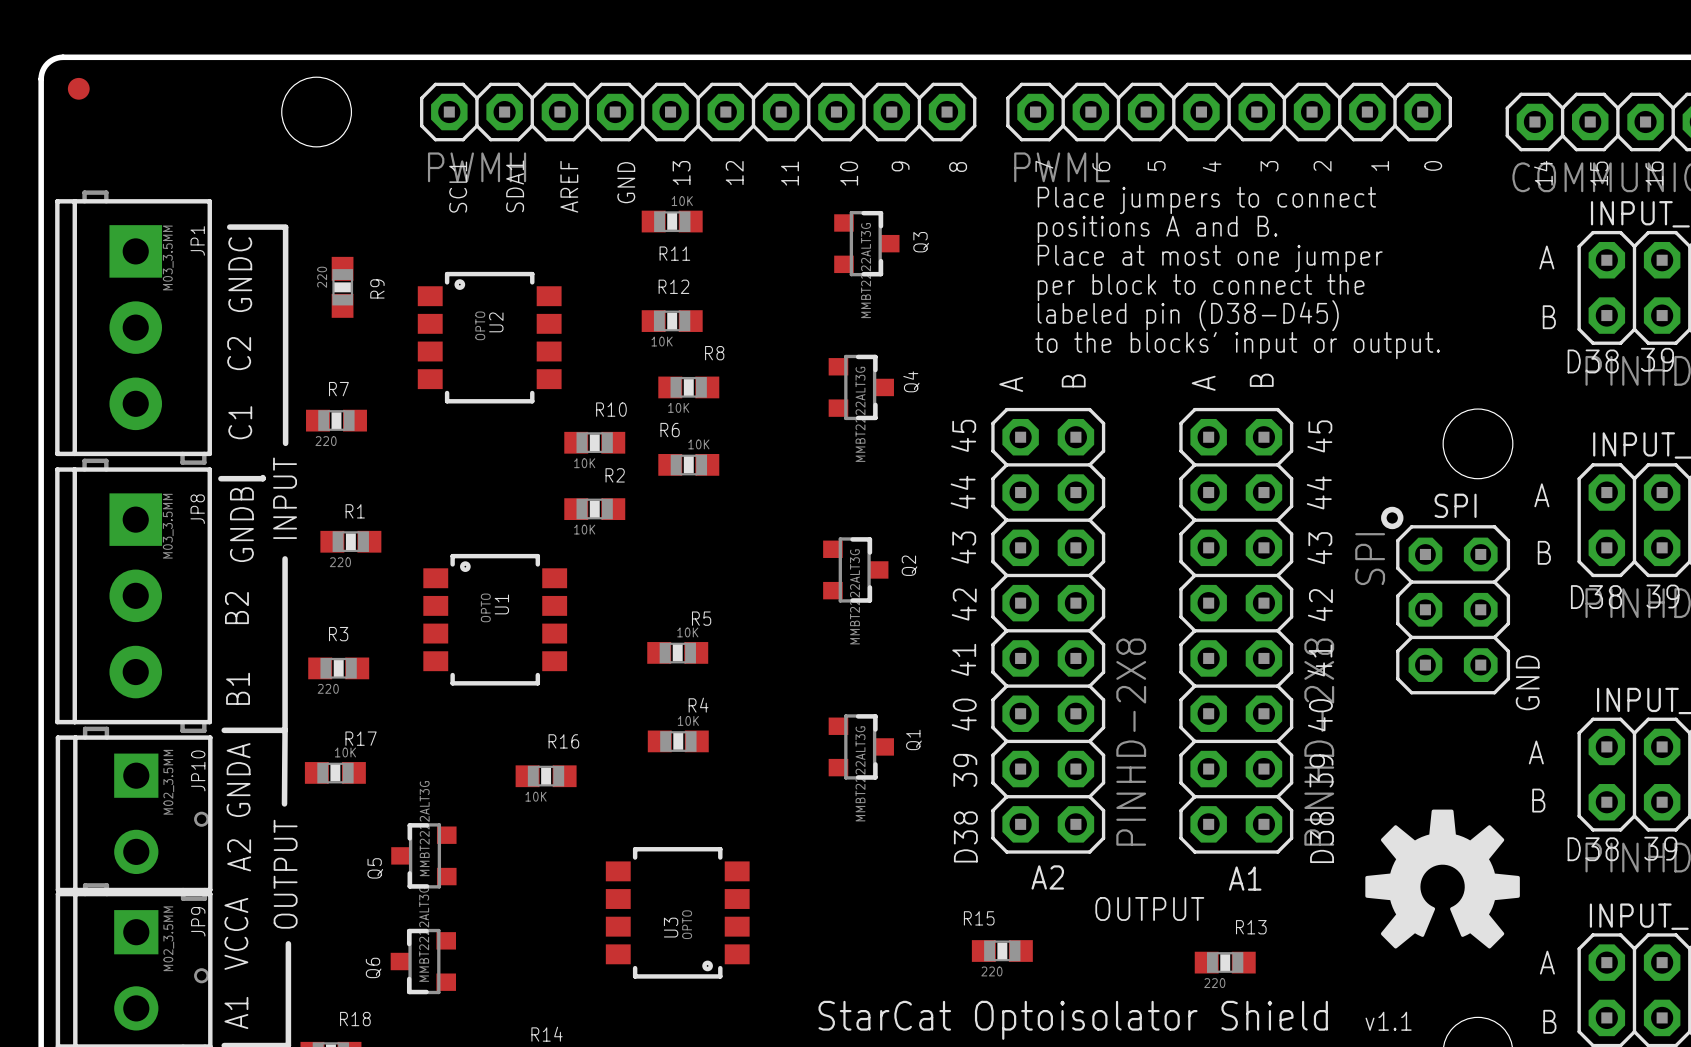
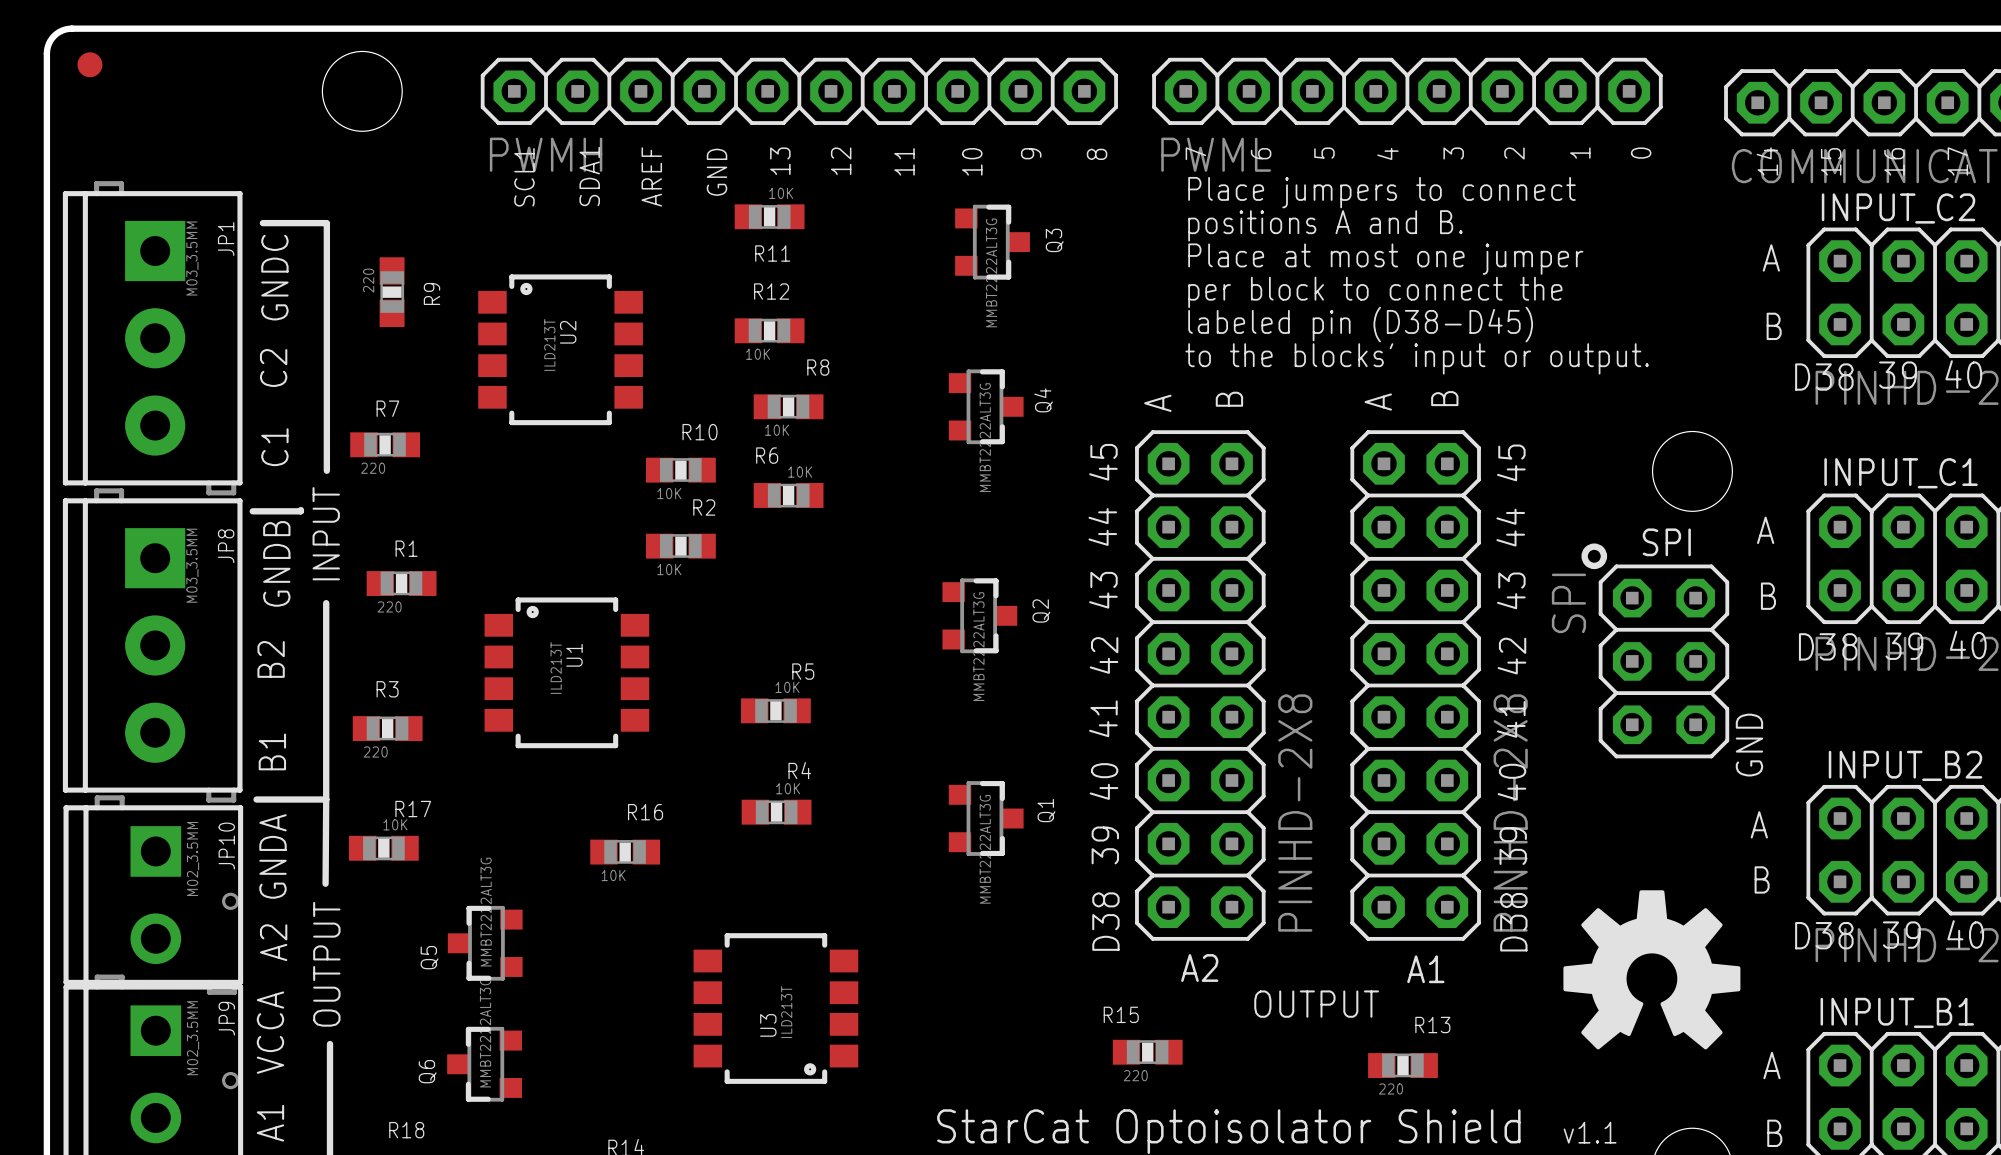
U2 value: OPTO (480, 325) -> ILD213T (549, 344)
U1 value: OPTO (485, 607) -> ILD213T (556, 667)
U3 value: OPTO (687, 924) -> ILD213T (786, 1012)

